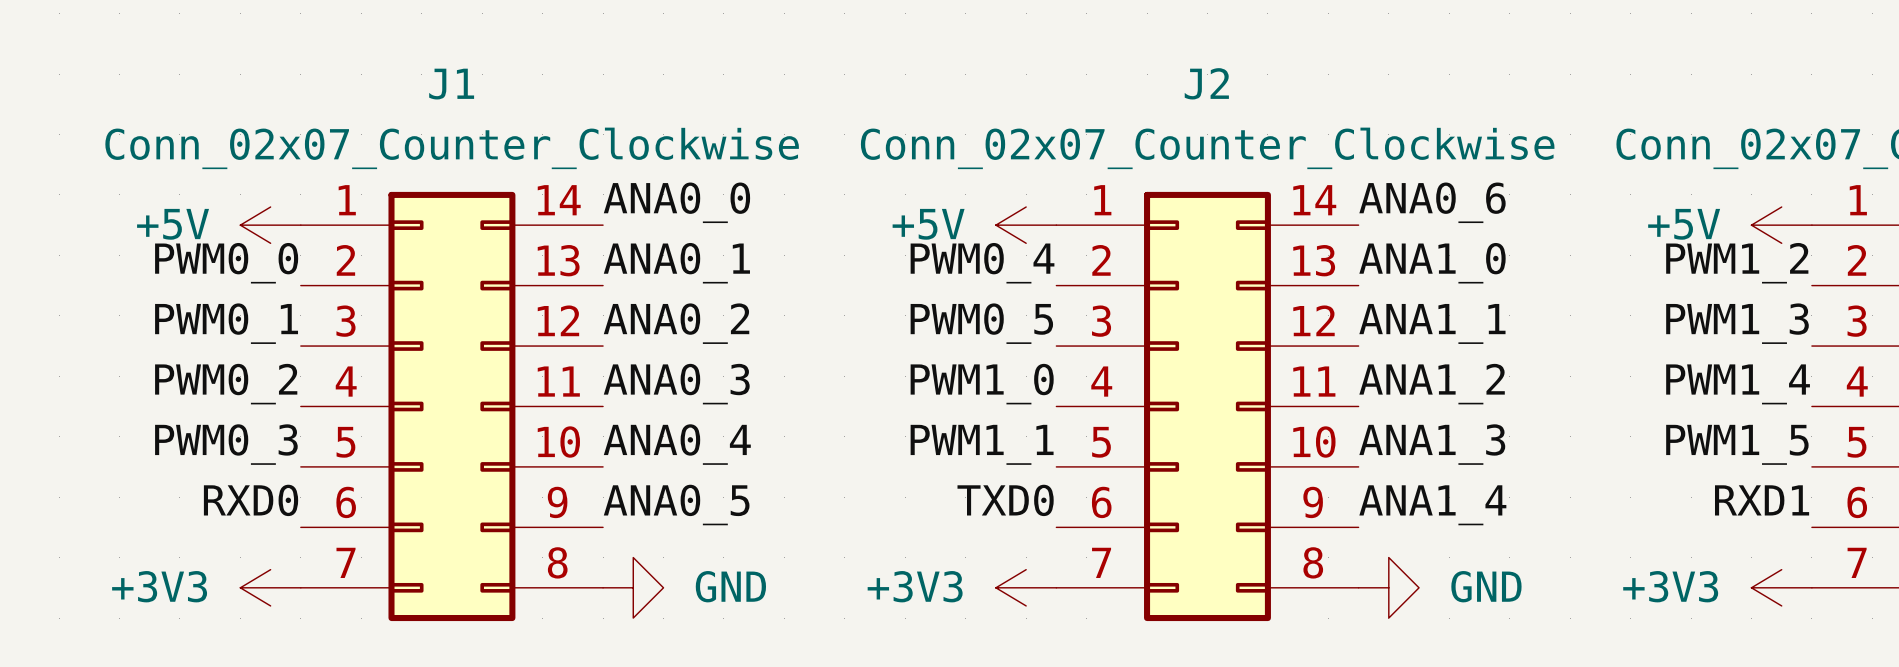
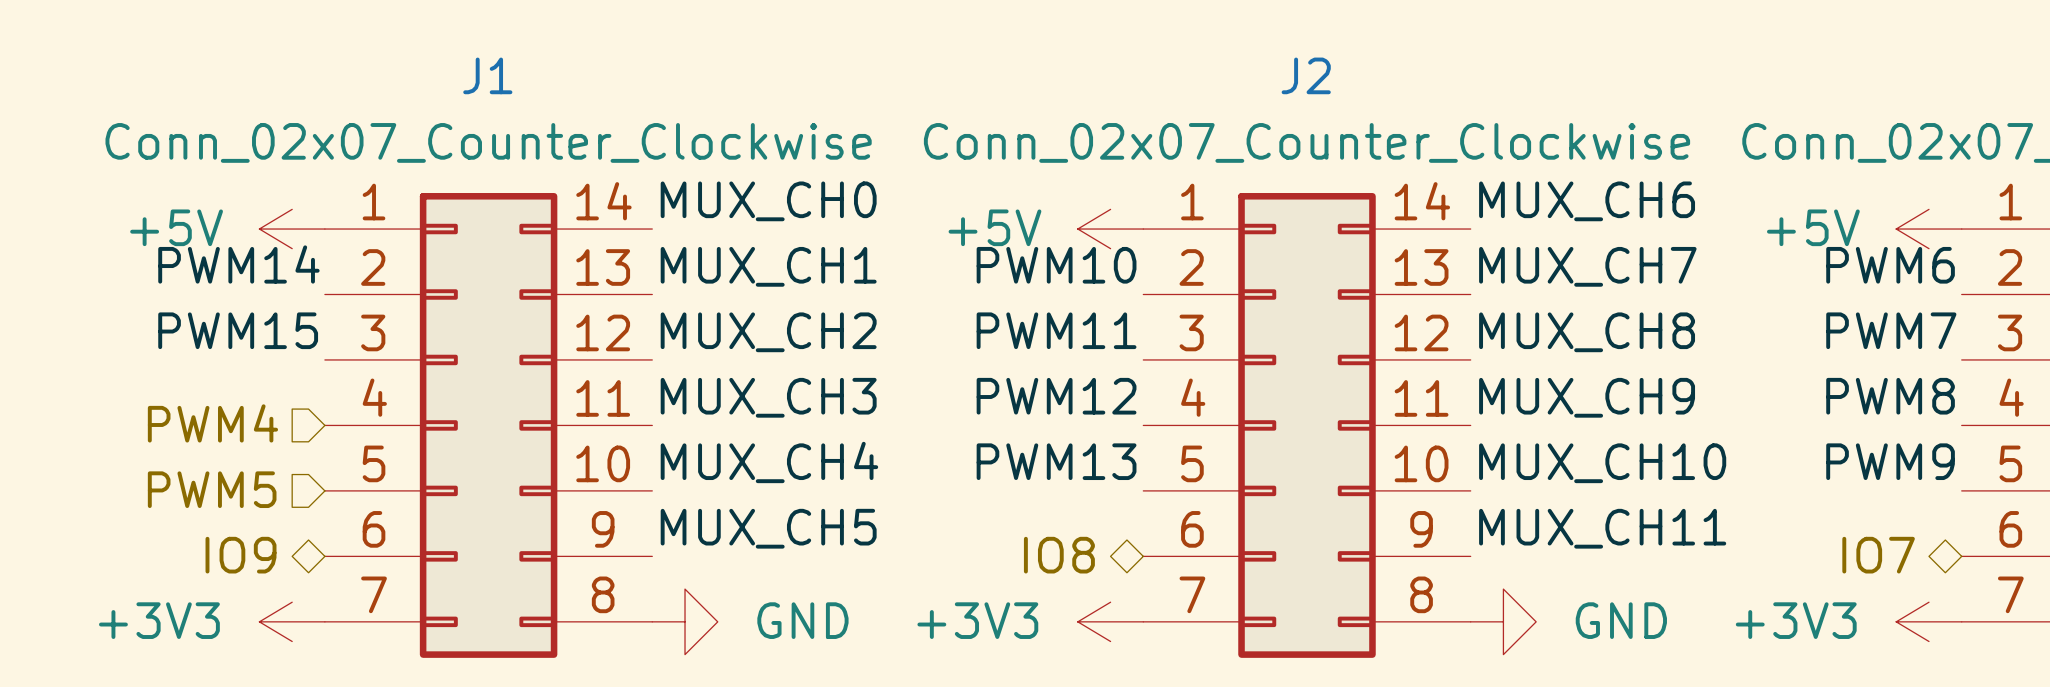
label: ANA0_0 (676, 202) -> MUX_CH0 (768, 201)
label: ANA0_6 (1432, 202) -> MUX_CH6 (1587, 201)
label: PWM0_0 (226, 263) -> PWM14 (238, 264)
label: ANA0_1 (676, 263) -> MUX_CH1 (768, 266)
label: PWM0_4 (982, 263) -> PWM10 (1056, 265)
label: ANA1_0 (1432, 263) -> MUX_CH7 (1587, 266)
label: PWM1_2 (1737, 263) -> PWM6 (1890, 265)
label: PWM0_1 (226, 323) -> PWM15 (238, 330)
label: ANA0_2 (676, 323) -> MUX_CH2 (768, 332)
label: PWM0_5 (981, 323) -> PWM11 (1056, 330)
label: ANA1_1 (1432, 323) -> MUX_CH8 (1587, 332)
label: PWM1_3 (1737, 323) -> PWM7 (1891, 330)
label: PWM0_2 (226, 384) -> none
label: ANA0_3 (676, 384) -> MUX_CH3 (768, 397)
label: PWM1_0 (982, 384) -> PWM12 (1056, 396)
label: ANA1_2 (1432, 384) -> MUX_CH9 (1587, 397)
label: PWM1_4 (1738, 384) -> PWM8 (1890, 396)
hierarchical label: none -> PWM4 (212, 423)
label: PWM0_3 (226, 444) -> none
label: ANA0_4 (677, 444) -> MUX_CH4 (769, 462)
label: PWM1_1 (982, 444) -> PWM13 (1056, 461)
label: ANA1_3 (1432, 444) -> MUX_CH10 (1602, 463)
label: PWM1_5 (1737, 444) -> PWM9 (1890, 461)
hierarchical label: none -> PWM5 (212, 489)
label: RXD0 (251, 500) -> none
label: TXD0 (1005, 500) -> none
label: RXD1 (1762, 500) -> none
label: ANA0_5 (676, 505) -> MUX_CH5 (768, 528)
label: ANA1_4 (1432, 505) -> MUX_CH11 (1602, 528)
hierarchical label: none -> IO9 (241, 555)
hierarchical label: none -> IO8 (1059, 555)
hierarchical label: none -> IO7 (1878, 555)

